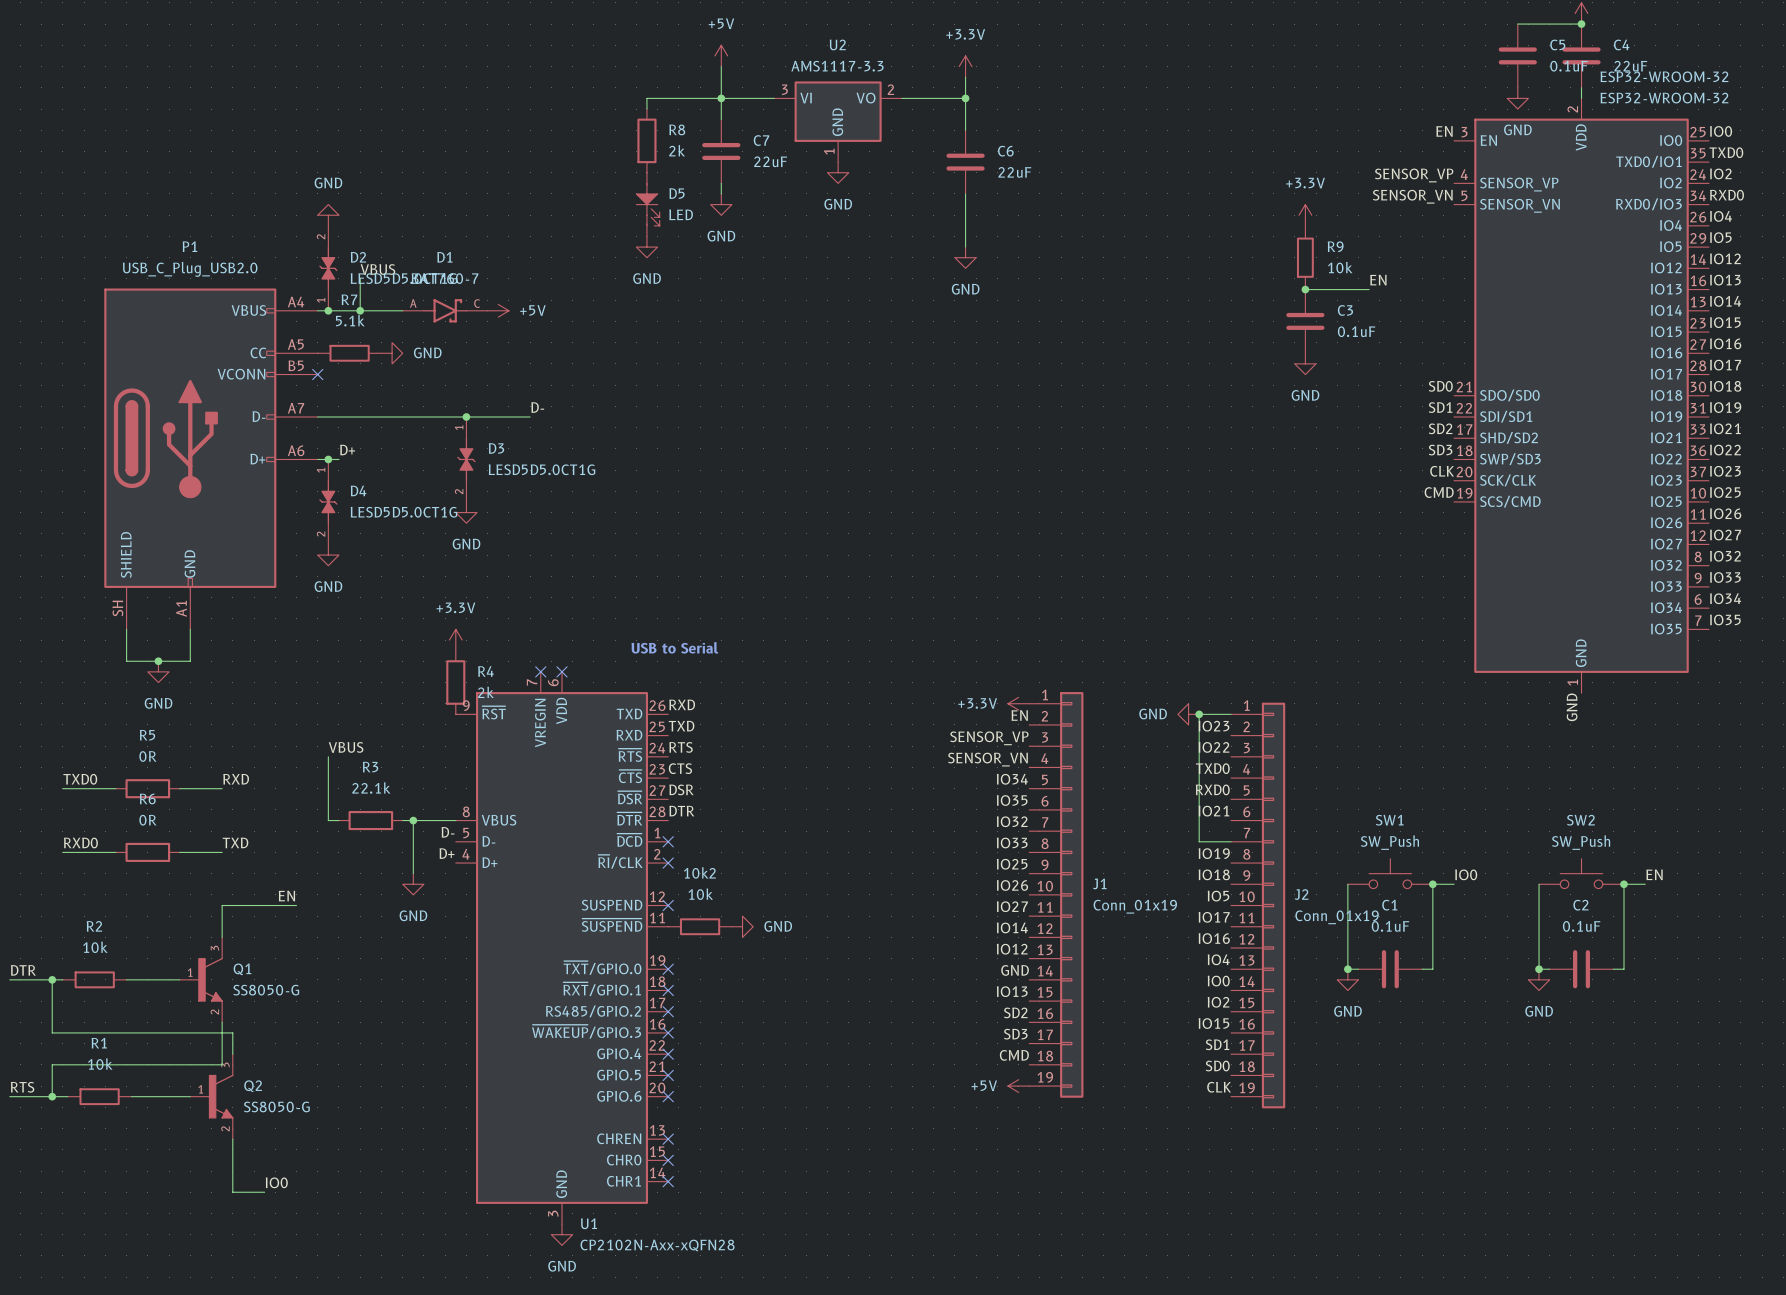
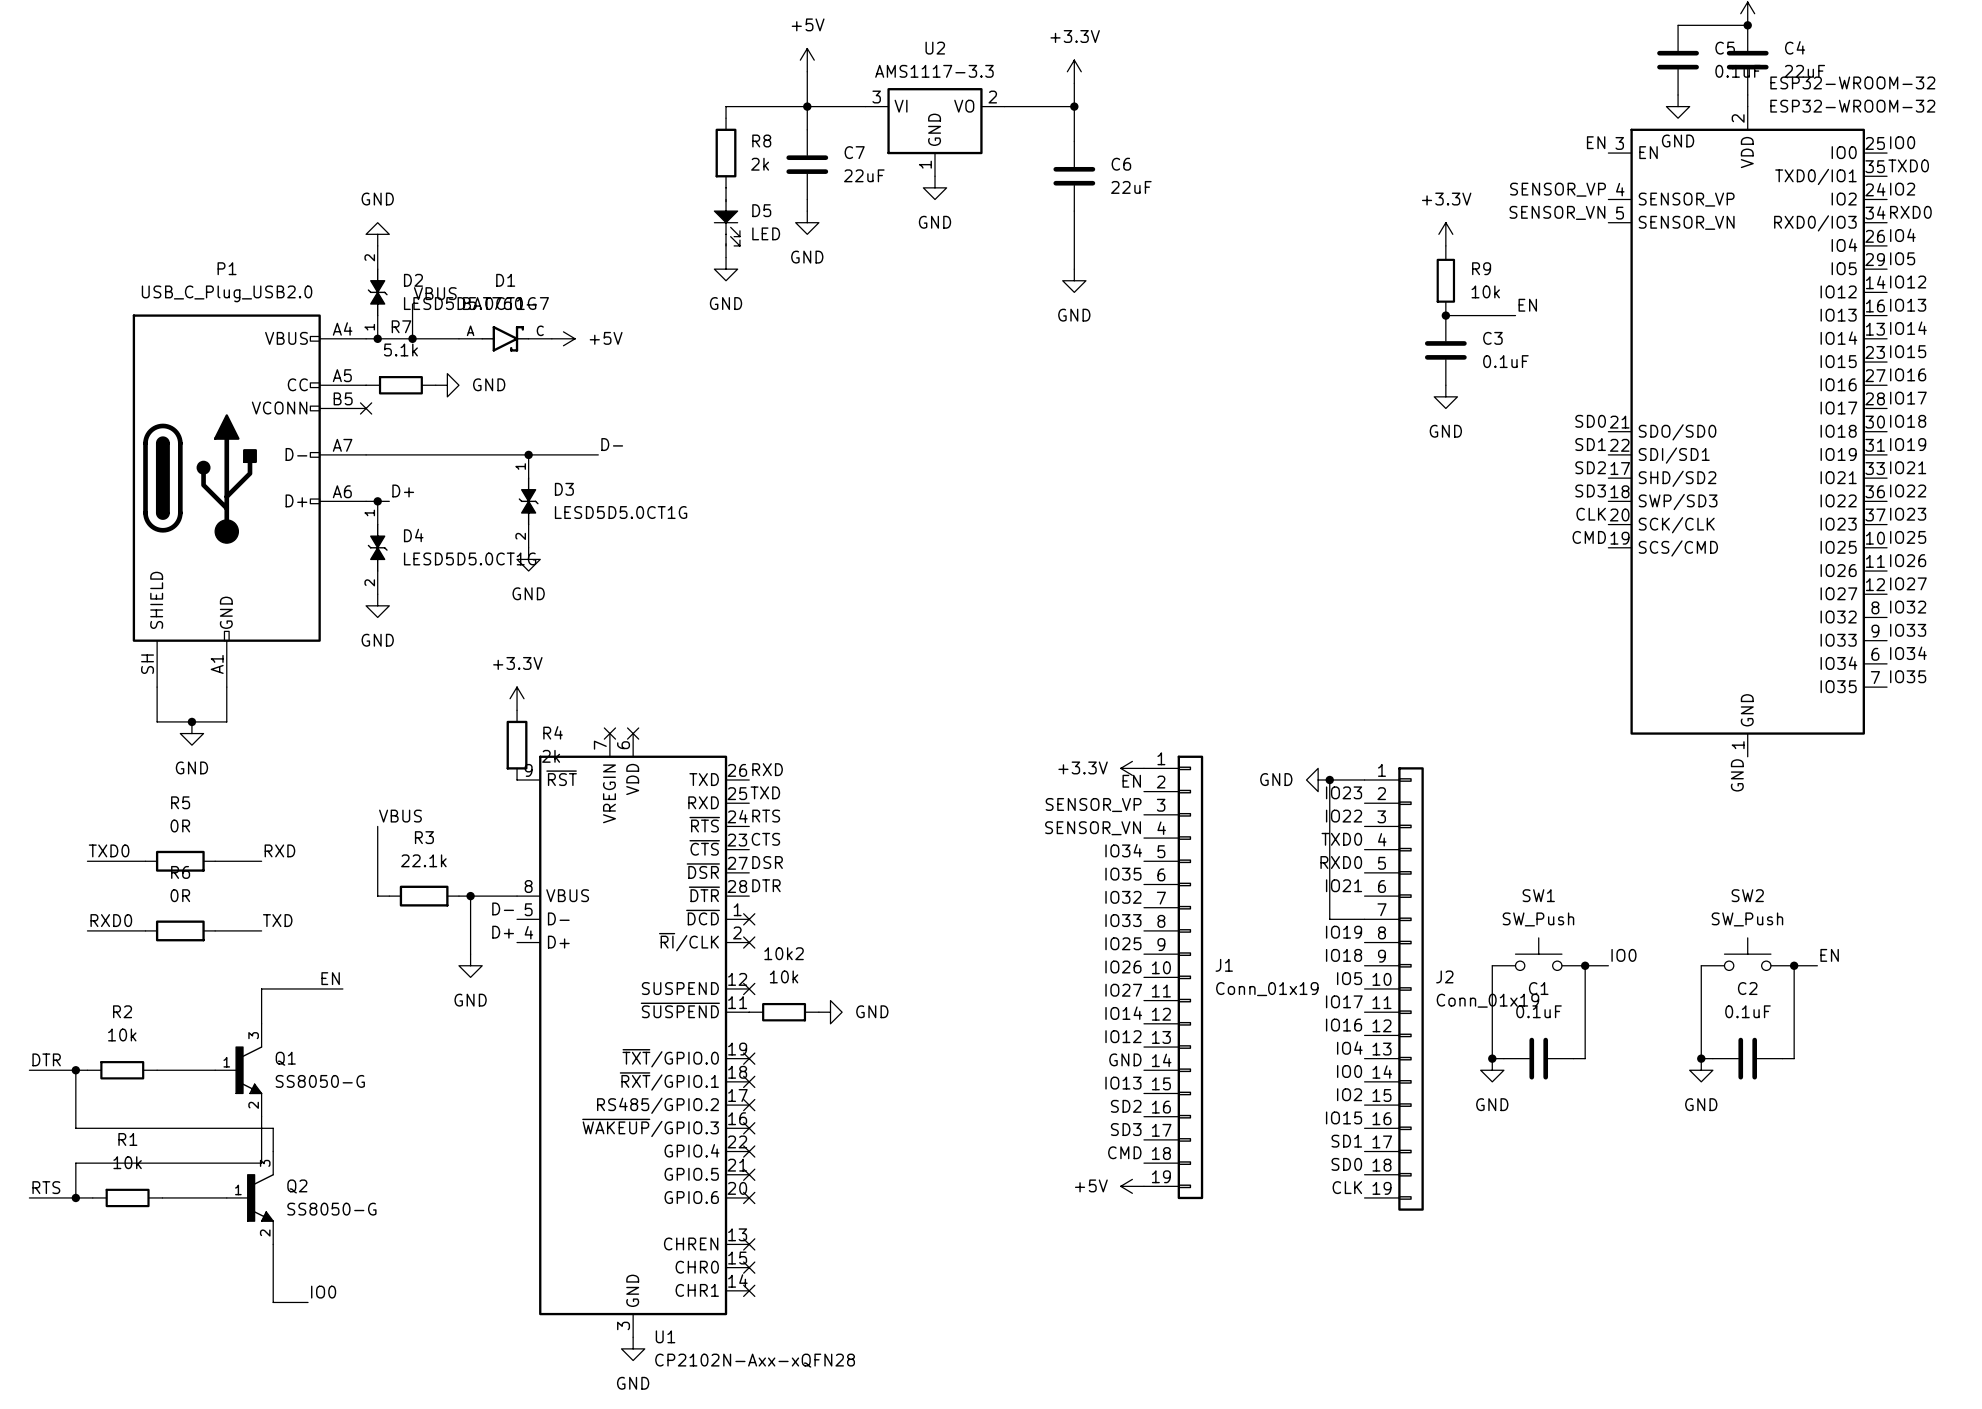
text: USB to Serial (674, 647) -> none

